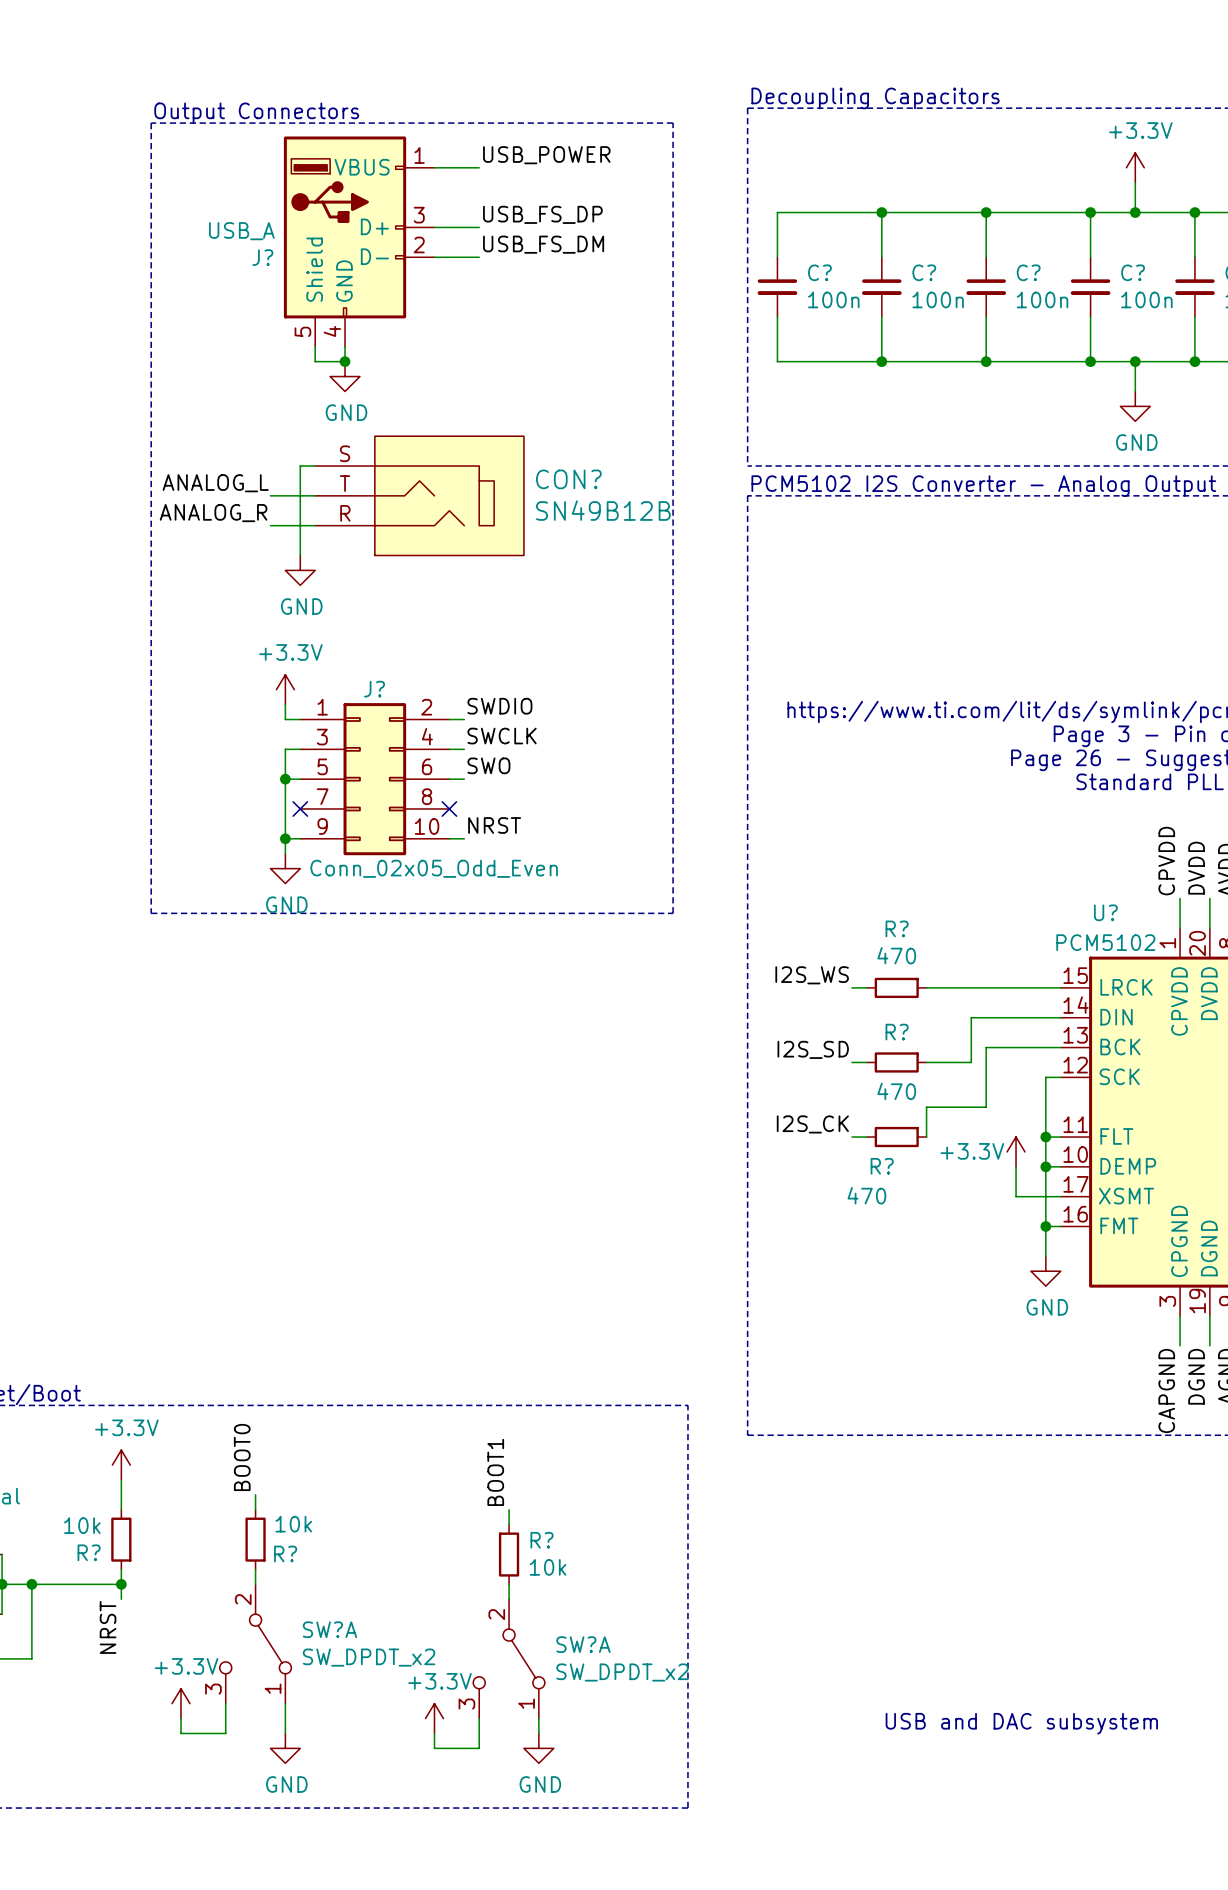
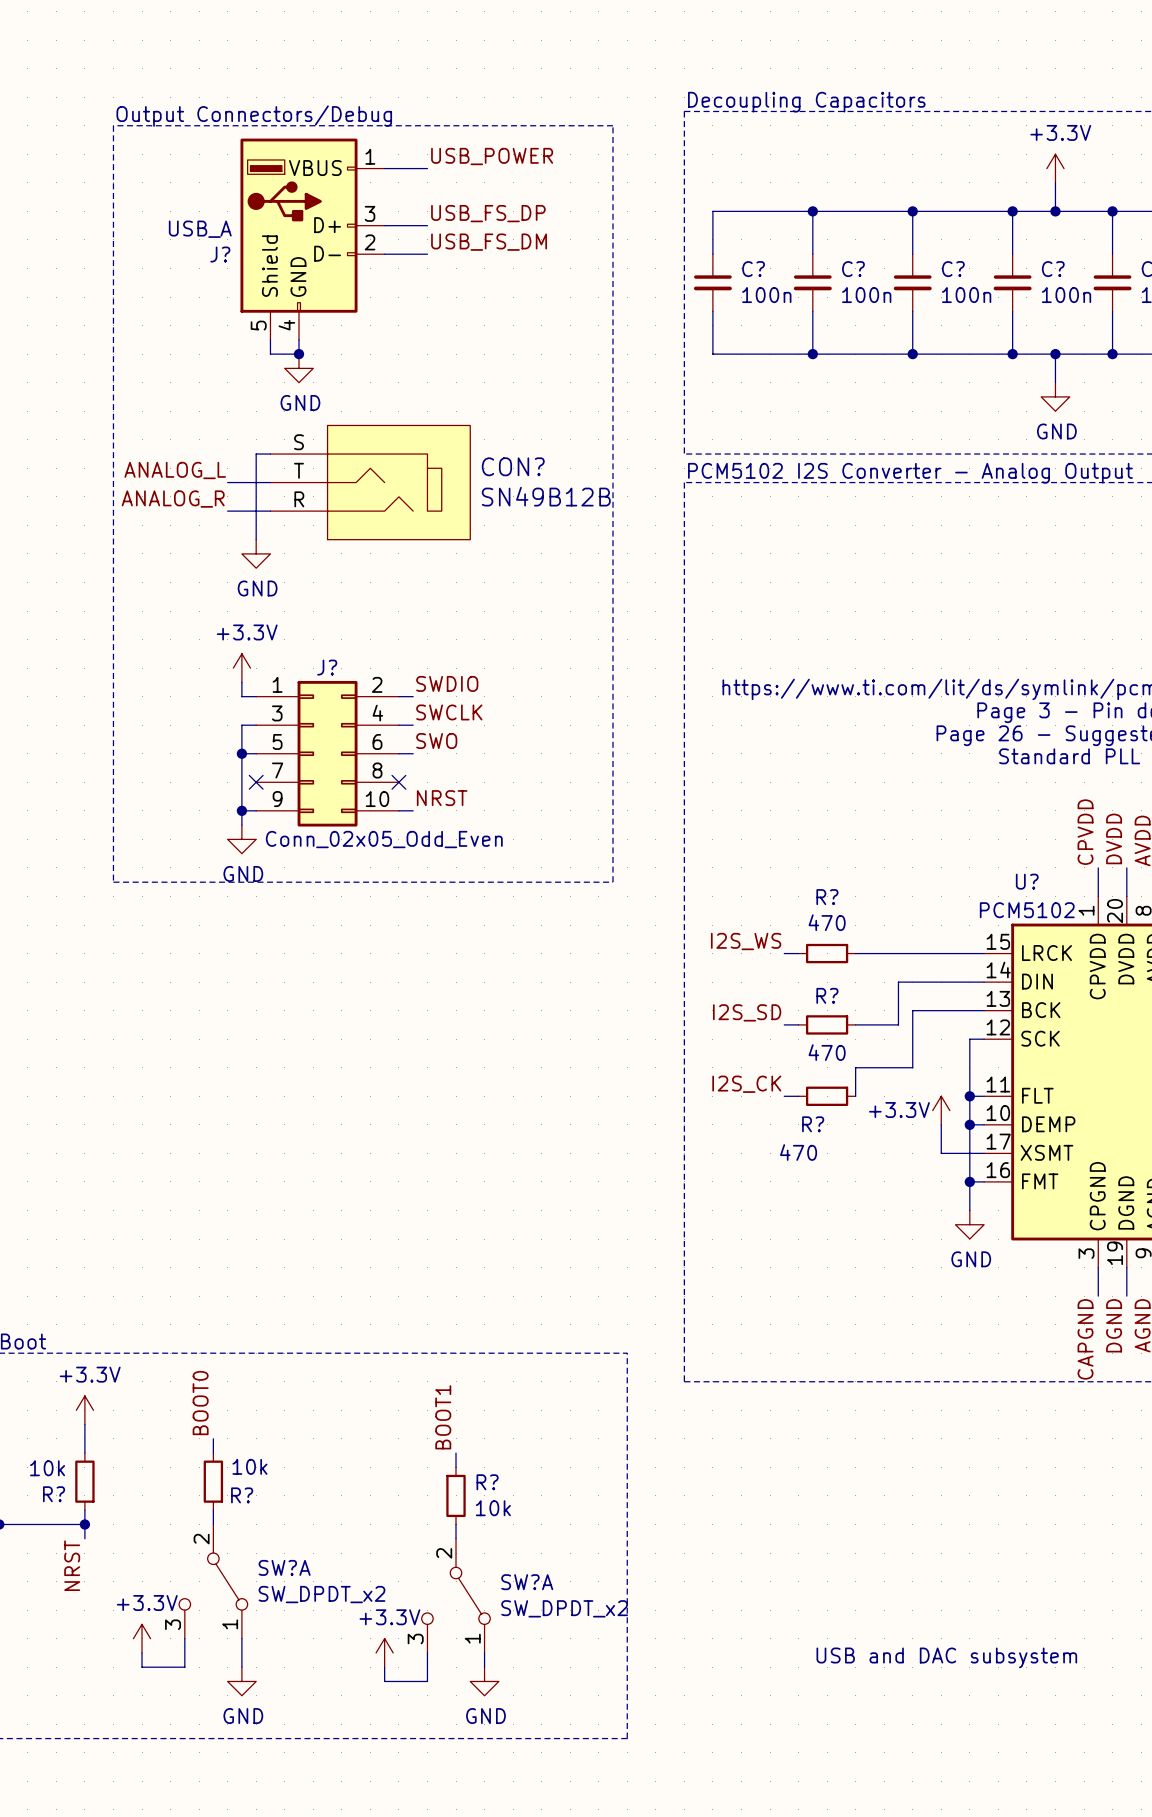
text: Output Connectors (256, 113) -> Output Connectors/Debug (254, 116)

